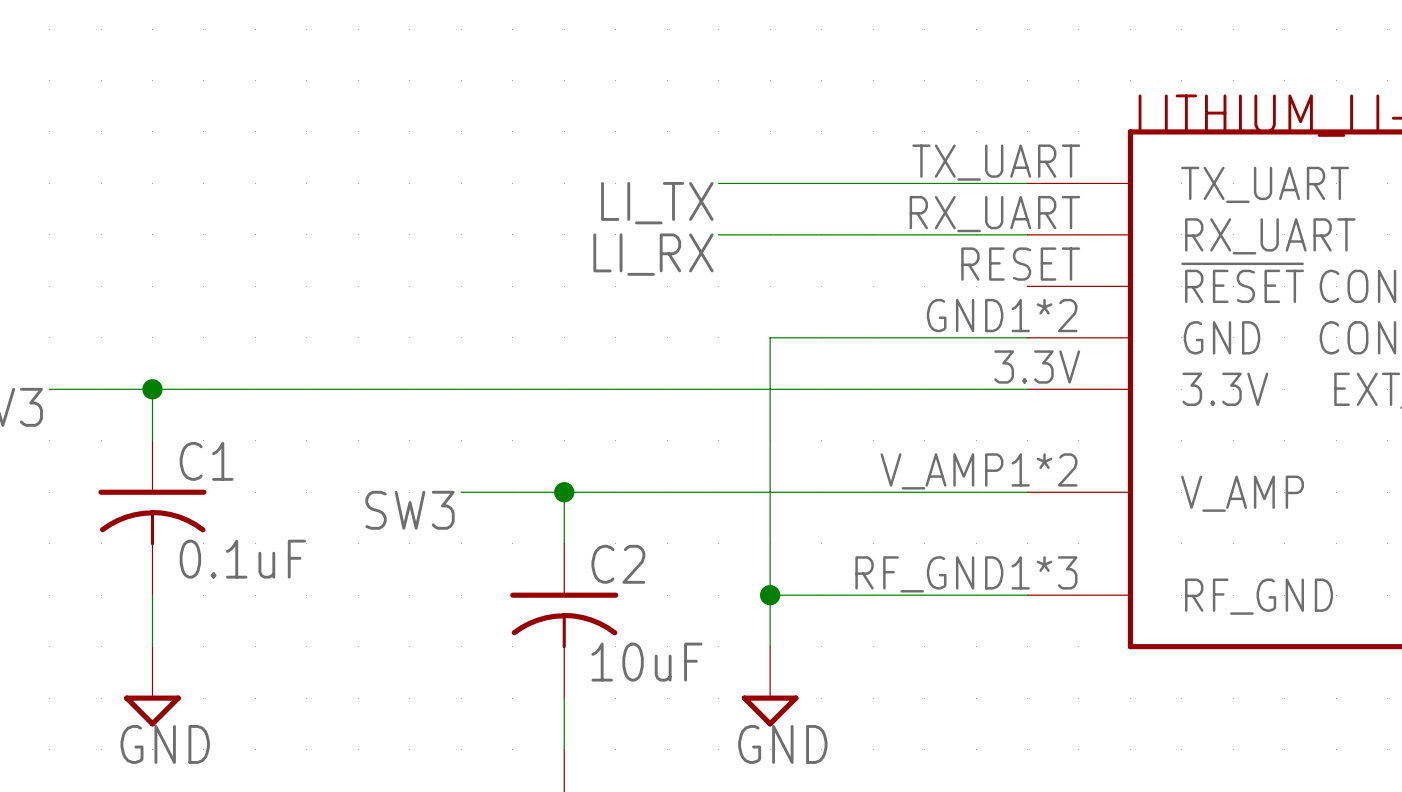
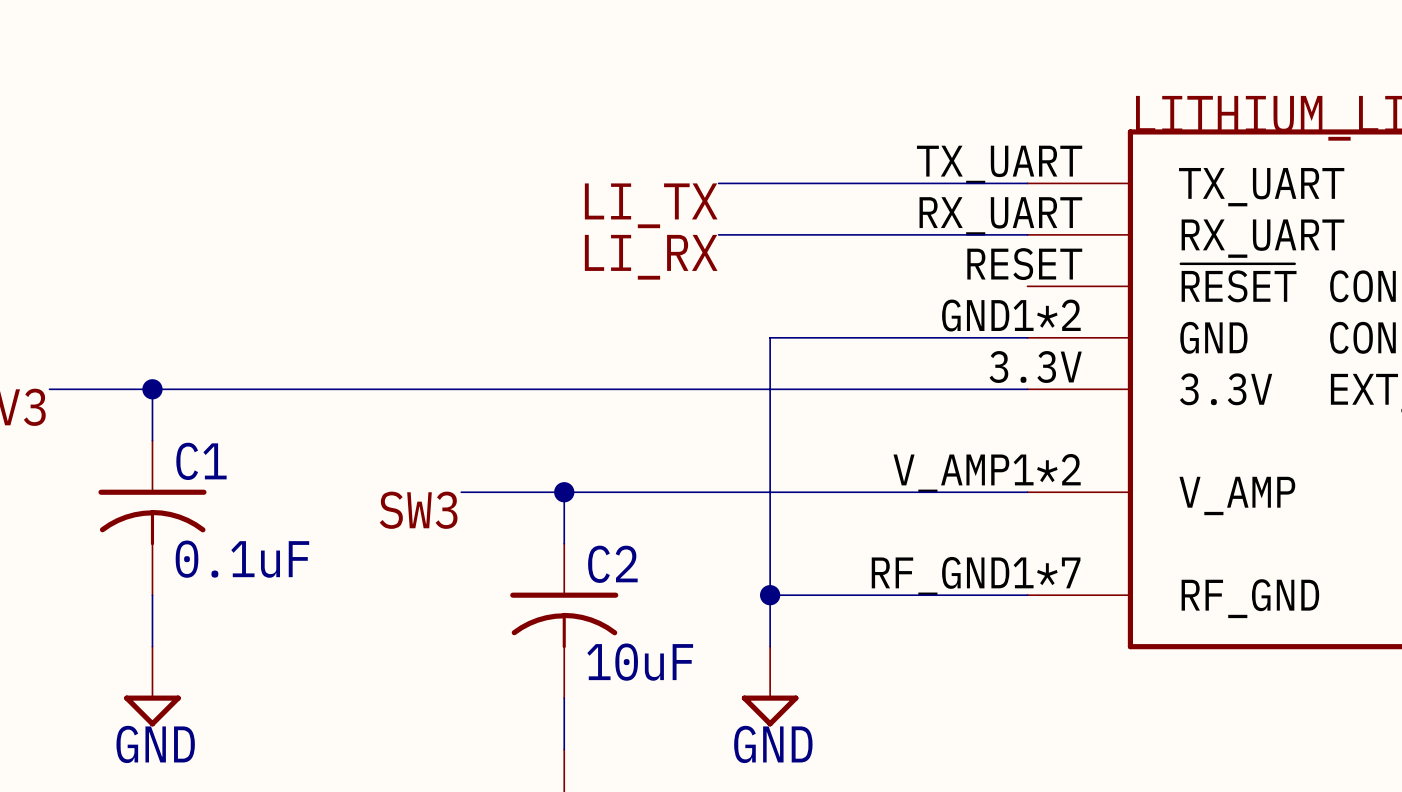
part pin number: RF_GND1*3 (966, 574) -> RF_GND1*7 (976, 576)

